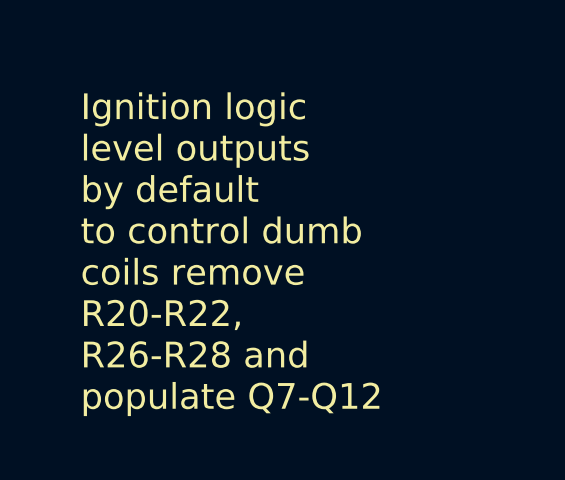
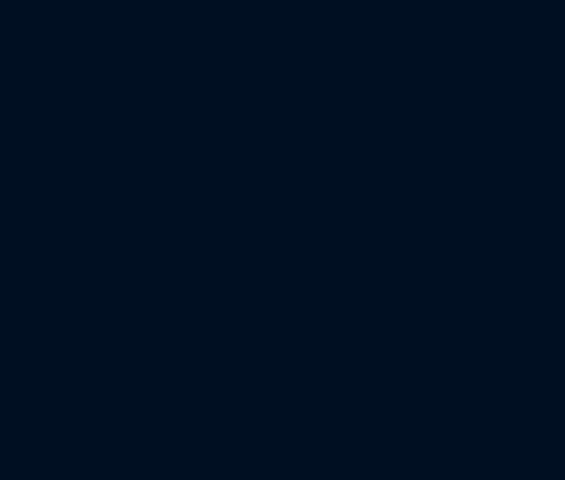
text: Ignition logic (194, 109) -> none
text: level outputs (196, 150) -> none
text: by default (171, 192) -> none
text: to control dumb (221, 230) -> none
text: coils remove (193, 271) -> none
text: R20-R22, (161, 314) -> none
text: R26-R28 and (195, 354) -> none
text: populate Q7-Q12 (231, 399) -> none

